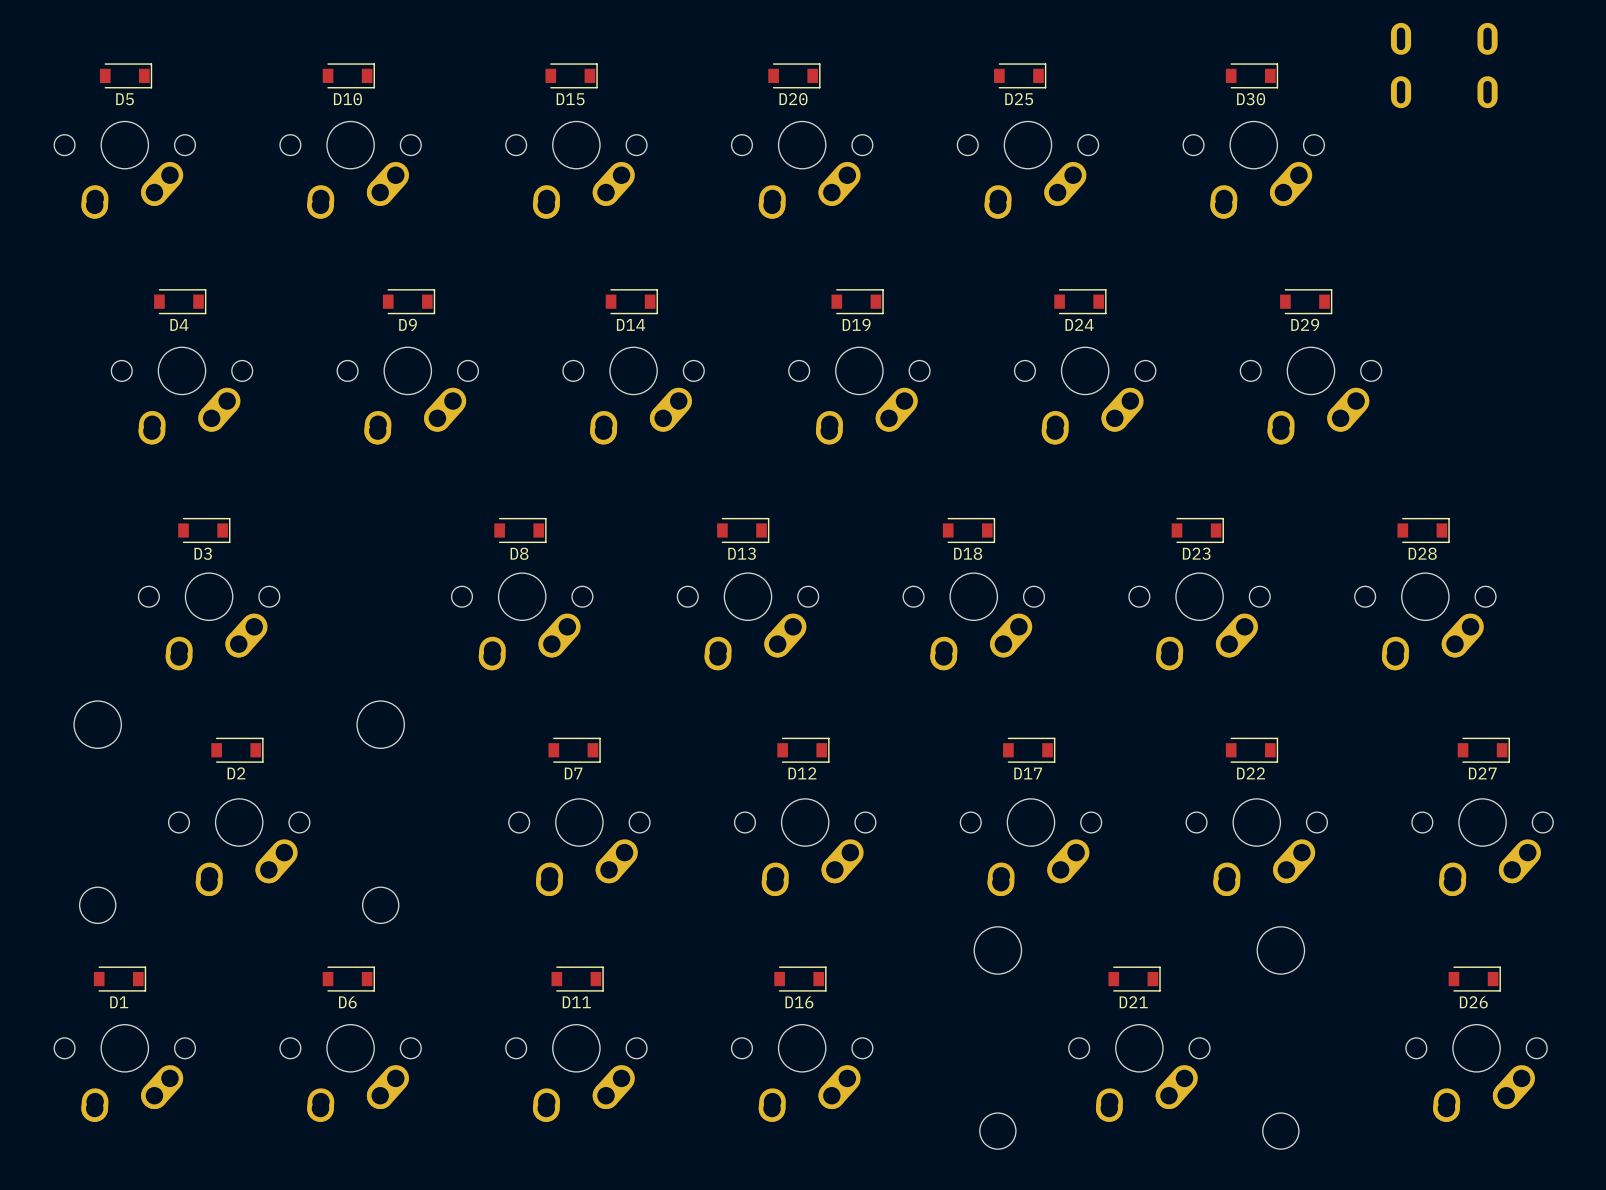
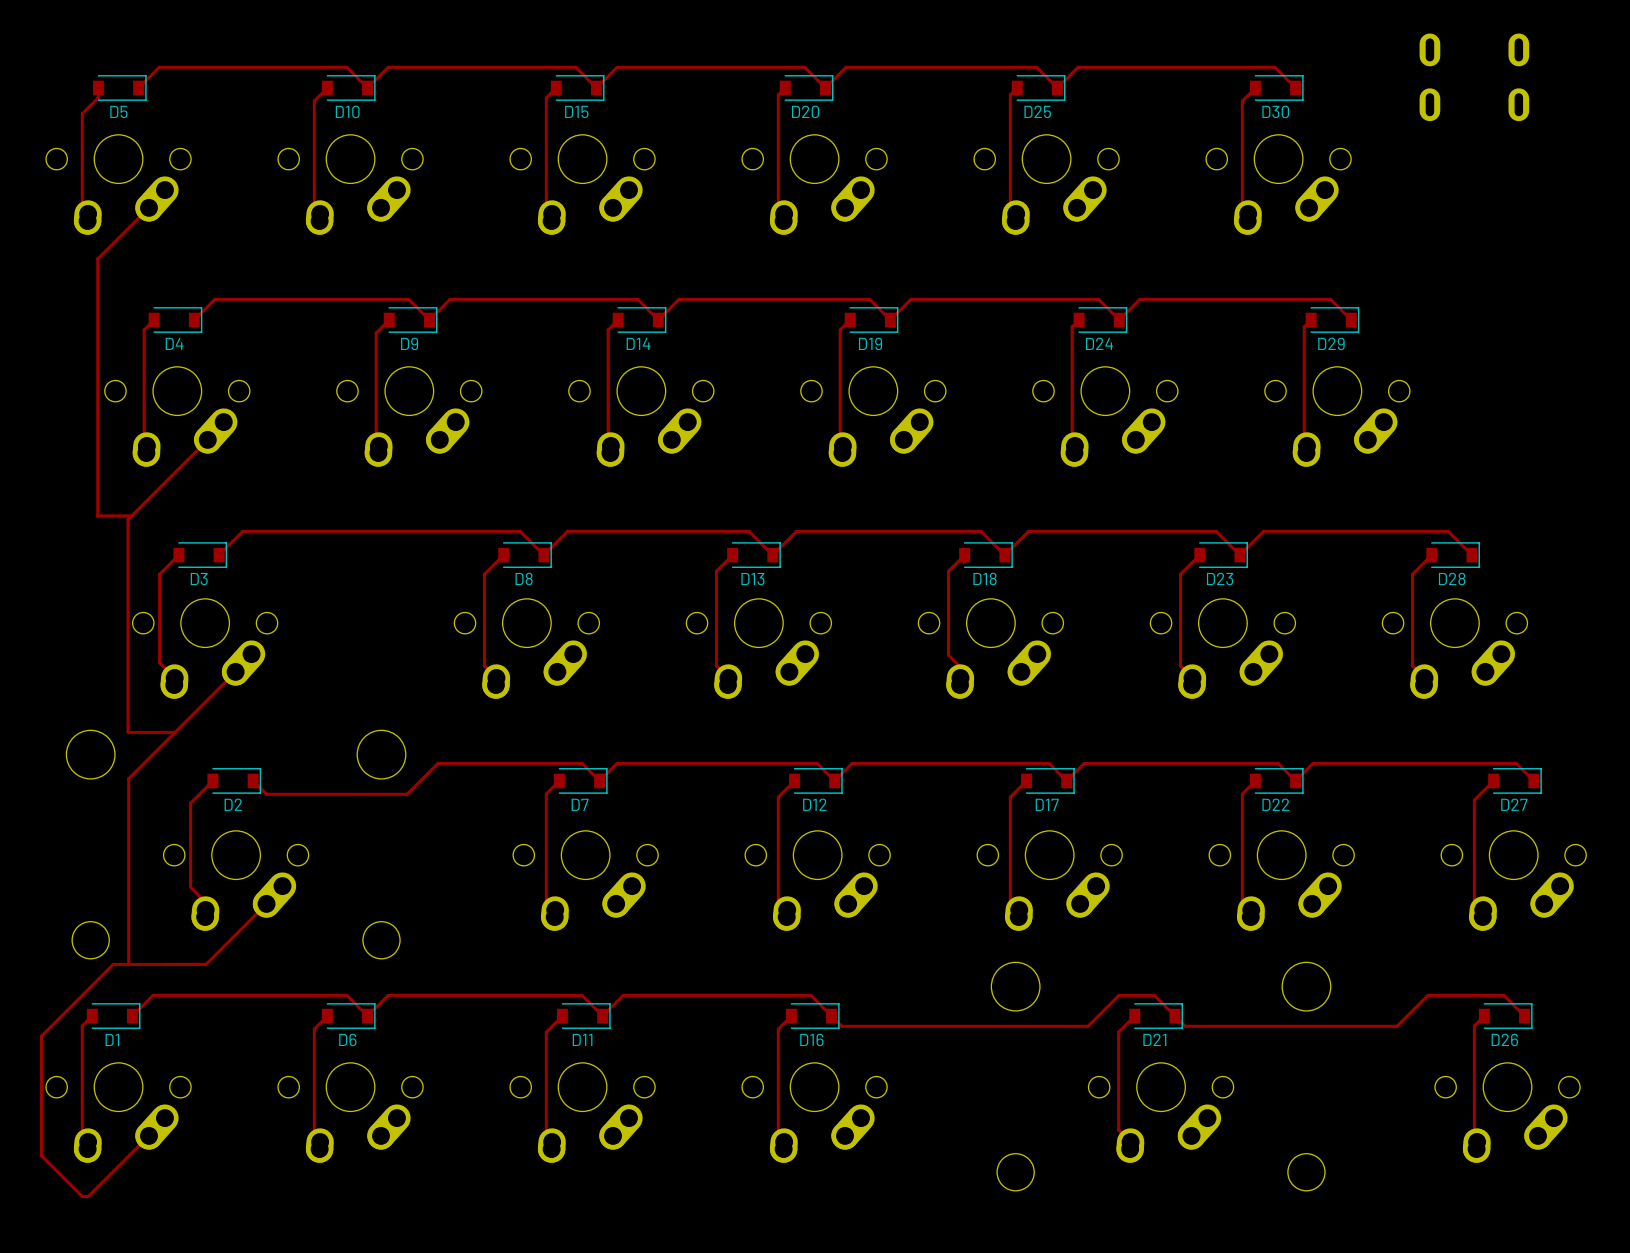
track: none -> (98, 87) (98, 97) (82, 113) (82, 206)
track: none -> (138, 87) (159, 67) (346, 67) (367, 87) (388, 67) (575, 67) (596, 87) (617, 67) (804, 67) (825, 87) (846, 67) (1036, 67) (1057, 87) (1078, 67) (1274, 67) (1295, 87)
track: none -> (327, 87) (314, 101) (314, 206)
track: none -> (556, 87) (546, 97) (546, 206)
track: none -> (785, 87) (778, 94) (778, 206)
track: none -> (1017, 87) (1010, 94) (1010, 206)
track: none -> (1255, 87) (1242, 101) (1242, 206)
track: none -> (148, 207) (97, 259) (97, 515) (131, 515)
track: none -> (154, 319) (144, 329) (144, 438)
track: none -> (194, 319) (214, 299) (408, 299) (429, 319) (450, 299) (637, 299) (658, 319) (679, 299) (869, 299) (890, 319) (911, 299) (1098, 299) (1119, 319) (1139, 299) (1330, 299) (1351, 319)
track: none -> (389, 319) (376, 333) (376, 438)
track: none -> (618, 319) (608, 329) (608, 438)
track: none -> (850, 319) (840, 329) (840, 438)
track: none -> (1079, 319) (1072, 326) (1072, 438)
track: none -> (1311, 319) (1304, 326) (1304, 438)
track: none -> (207, 439) (128, 519) (128, 731) (175, 732)
track: none -> (178, 555) (159, 574) (159, 662) (174, 677)
track: none -> (219, 555) (242, 531) (520, 531) (543, 555) (567, 531) (749, 531) (772, 555) (796, 531) (981, 531) (1004, 555) (1028, 531) (1216, 531) (1239, 555) (1263, 531) (1448, 531) (1471, 555)
track: none -> (503, 555) (484, 574) (484, 665) (496, 677)
track: none -> (732, 555) (716, 571) (716, 665) (728, 677)
track: none -> (1199, 555) (1180, 574) (1180, 665) (1192, 677)
track: none -> (1431, 555) (1412, 574) (1412, 665) (1424, 677)
track: none -> (963, 562) (964, 555) (948, 571) (948, 655) (963, 670)
track: none -> (235, 671) (128, 778) (128, 964)
track: none -> (212, 780) (190, 803) (190, 887) (206, 902)
track: none -> (253, 780) (266, 794) (407, 794) (438, 763) (582, 763) (599, 780) (617, 763) (817, 763) (834, 780) (852, 763) (1049, 763) (1066, 780) (1084, 763) (1278, 763) (1295, 780) (1313, 763) (1516, 763) (1533, 780)
track: none -> (559, 780) (546, 793) (546, 901) (555, 909)
track: none -> (794, 780) (778, 797) (778, 901) (787, 909)
track: none -> (1026, 780) (1010, 797) (1010, 901) (1019, 909)
track: none -> (1255, 780) (1242, 793) (1242, 901) (1251, 909)
track: none -> (1493, 780) (1474, 800) (1474, 901) (1483, 909)
track: none -> (266, 903) (205, 964) (113, 964) (41, 1036) (41, 1155) (82, 1196) (88, 1196) (148, 1135)
track: none -> (92, 1016) (82, 1025) (82, 1136) (88, 1141)
track: none -> (132, 1016) (153, 995) (346, 995) (367, 1016) (388, 995) (582, 995) (602, 1016) (623, 995) (810, 995) (841, 1026) (1088, 1026) (1118, 995) (1154, 995) (1185, 1026) (1397, 1026) (1427, 995) (1503, 995) (1524, 1016)
track: none -> (327, 1016) (314, 1029) (314, 1136) (320, 1141)
track: none -> (562, 1016) (546, 1032) (546, 1136) (552, 1141)
track: none -> (791, 1016) (778, 1029) (778, 1136) (784, 1141)
track: none -> (1134, 1016) (1118, 1032) (1118, 1130) (1130, 1141)
track: none -> (1484, 1016) (1474, 1025) (1474, 1134)

